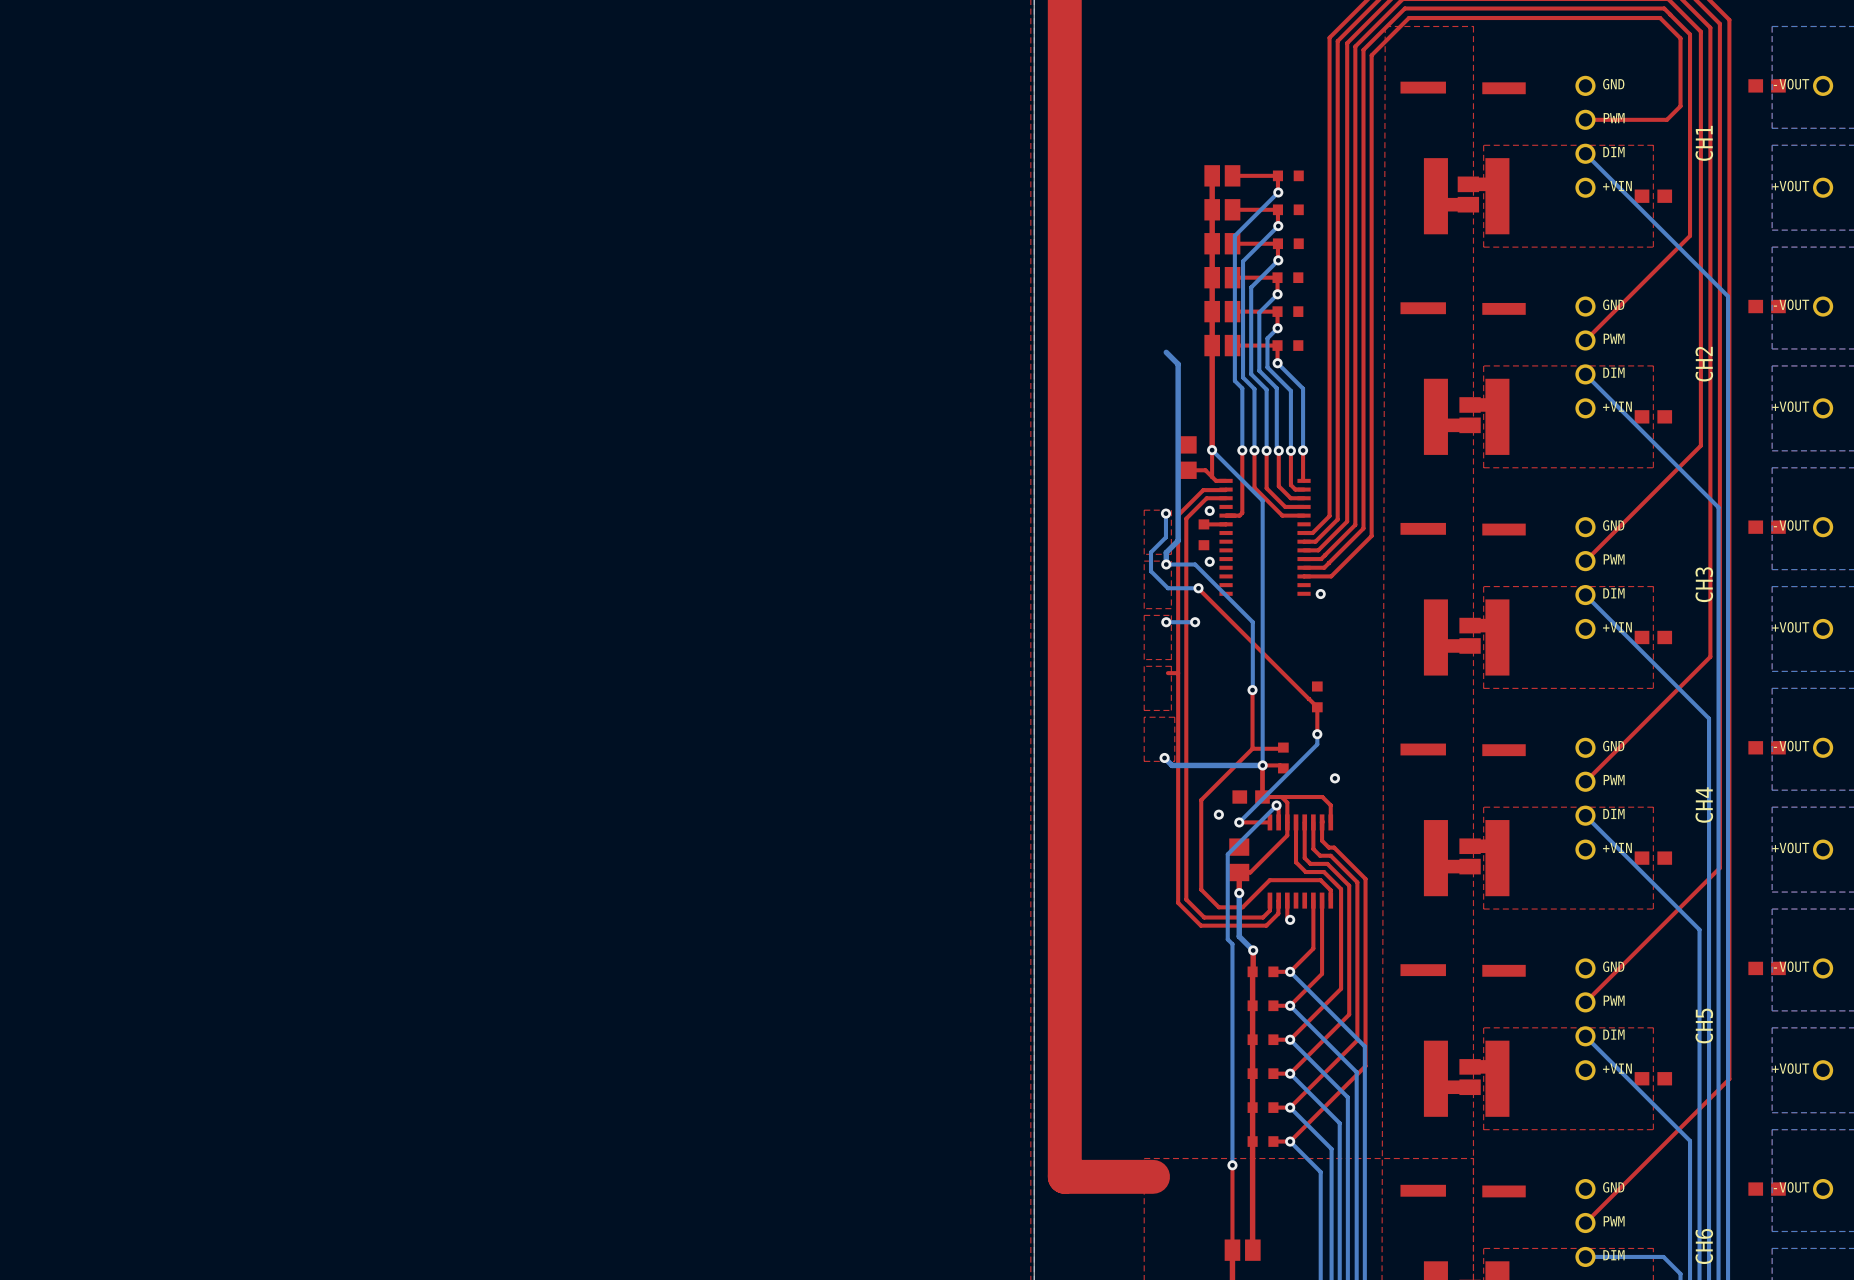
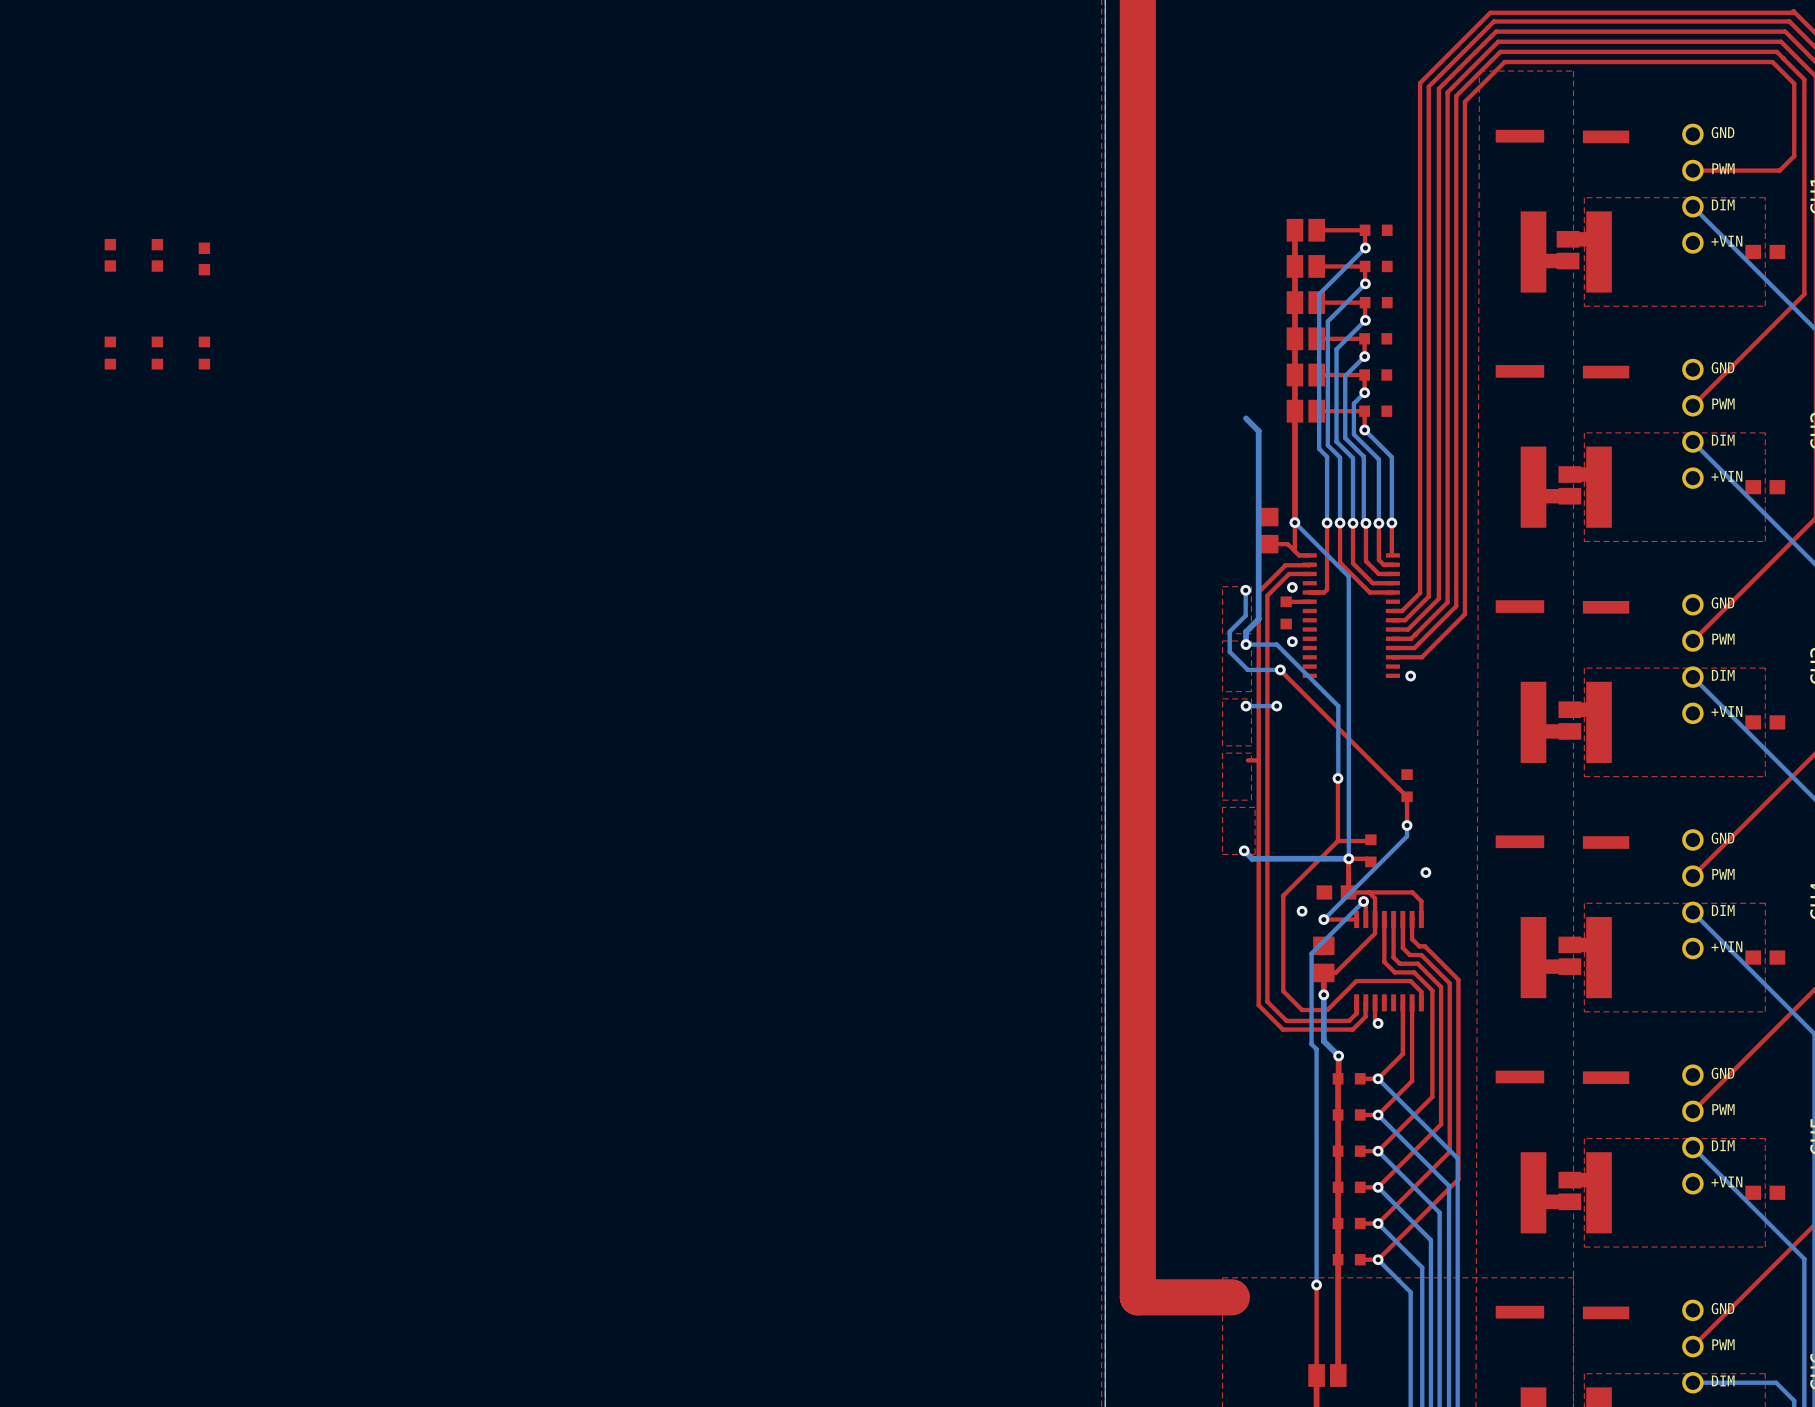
part: none -> (110, 255)
part: none -> (157, 255)
part: none -> (204, 258)
part: none -> (110, 353)
part: none -> (157, 353)
part: none -> (204, 353)

